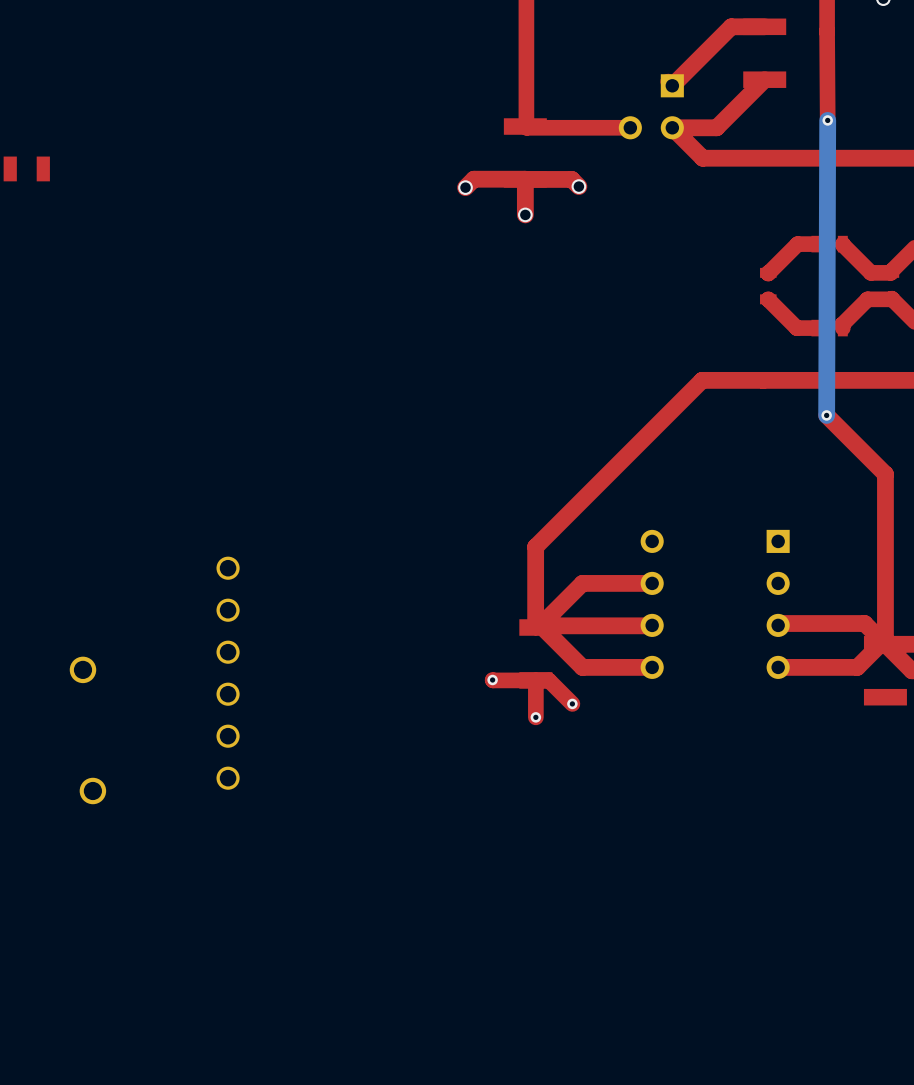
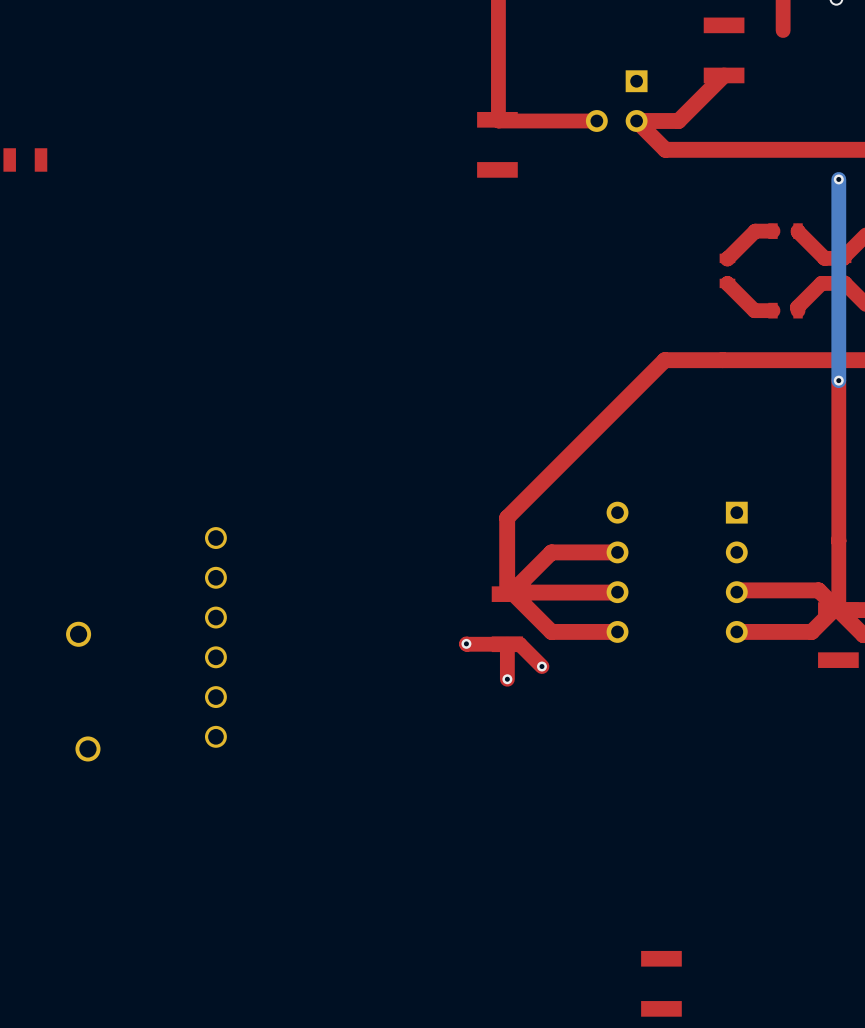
top track: (764, 26) (731, 26) (672, 85) (668, 81) -> none
top track: (827, 30) (827, 120) -> none
bottom track: (827, 120) (826, 415) -> none
via position: (827, 120) -> (838, 179)
top track: (525, 179) (473, 179) (465, 187) -> none
top track: (578, 186) (571, 179) (525, 179) (525, 214) -> none
via: (578, 186) -> none
via: (465, 187) -> none
bottom track: none -> (838, 179) (838, 380)
via: (525, 214) -> none
top track: (826, 415) (885, 474) (885, 644) -> (838, 380) (838, 610)
via position: (826, 415) -> (838, 380)
part: none -> (661, 983)

